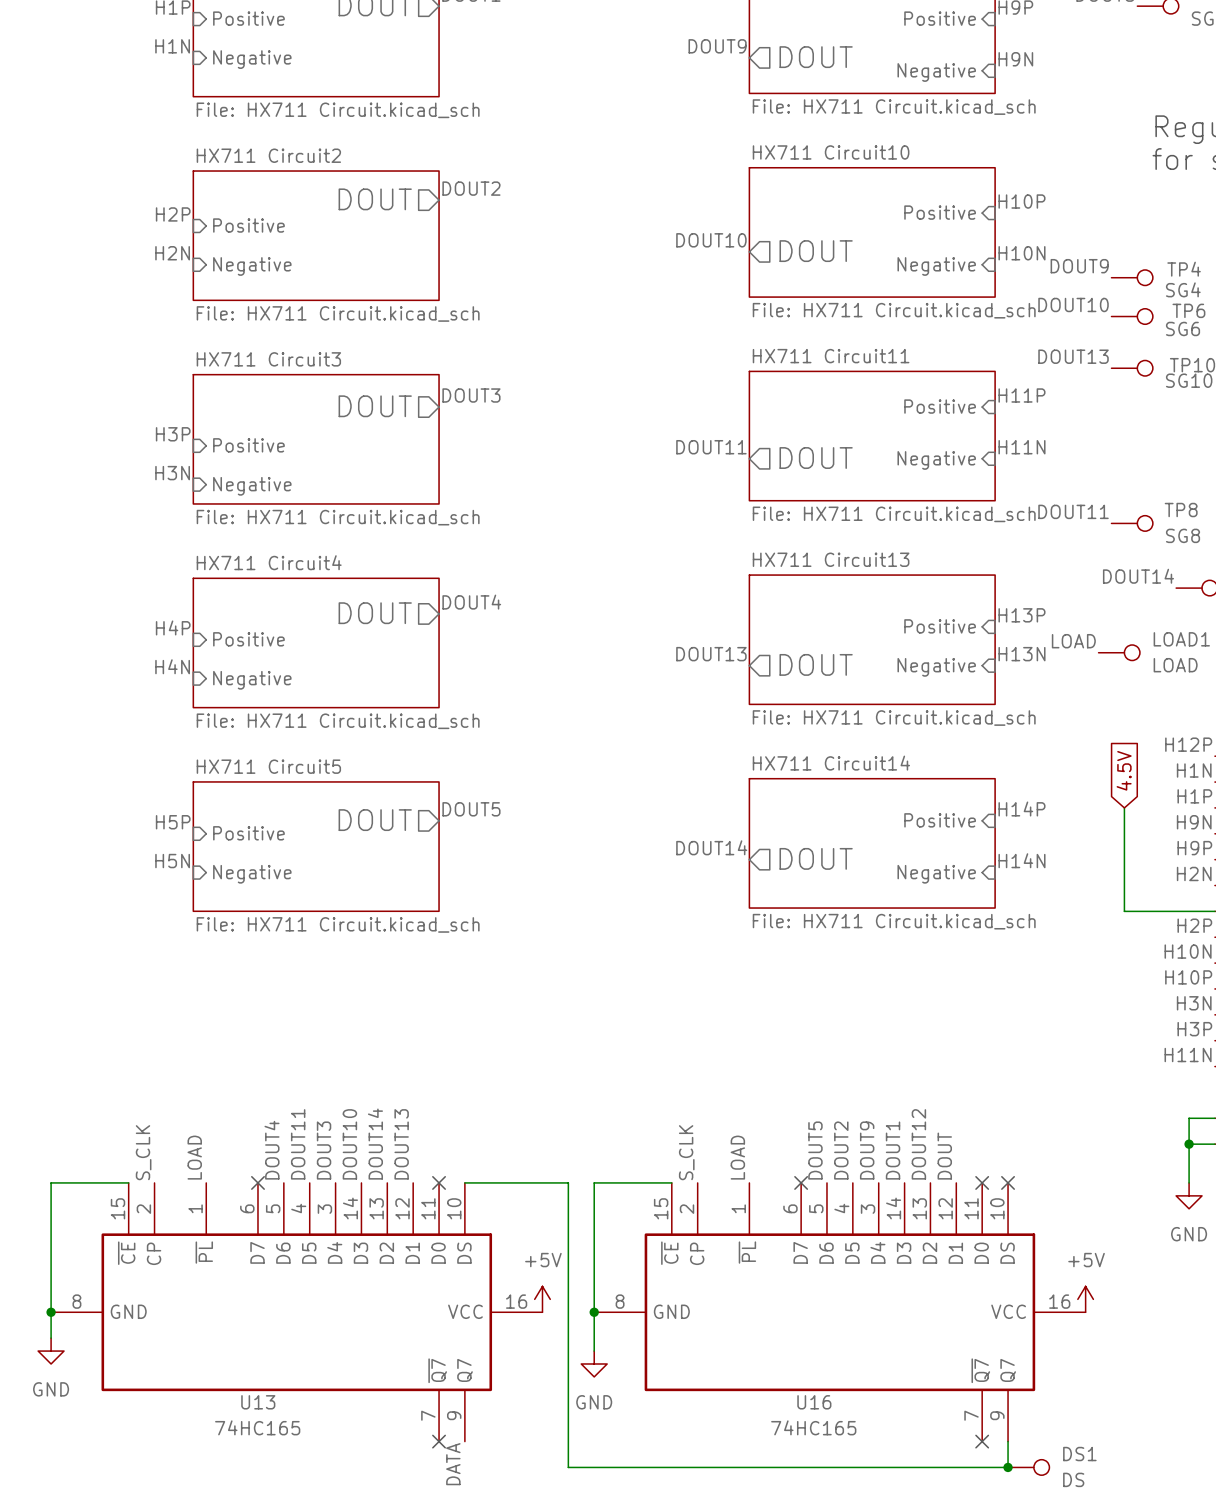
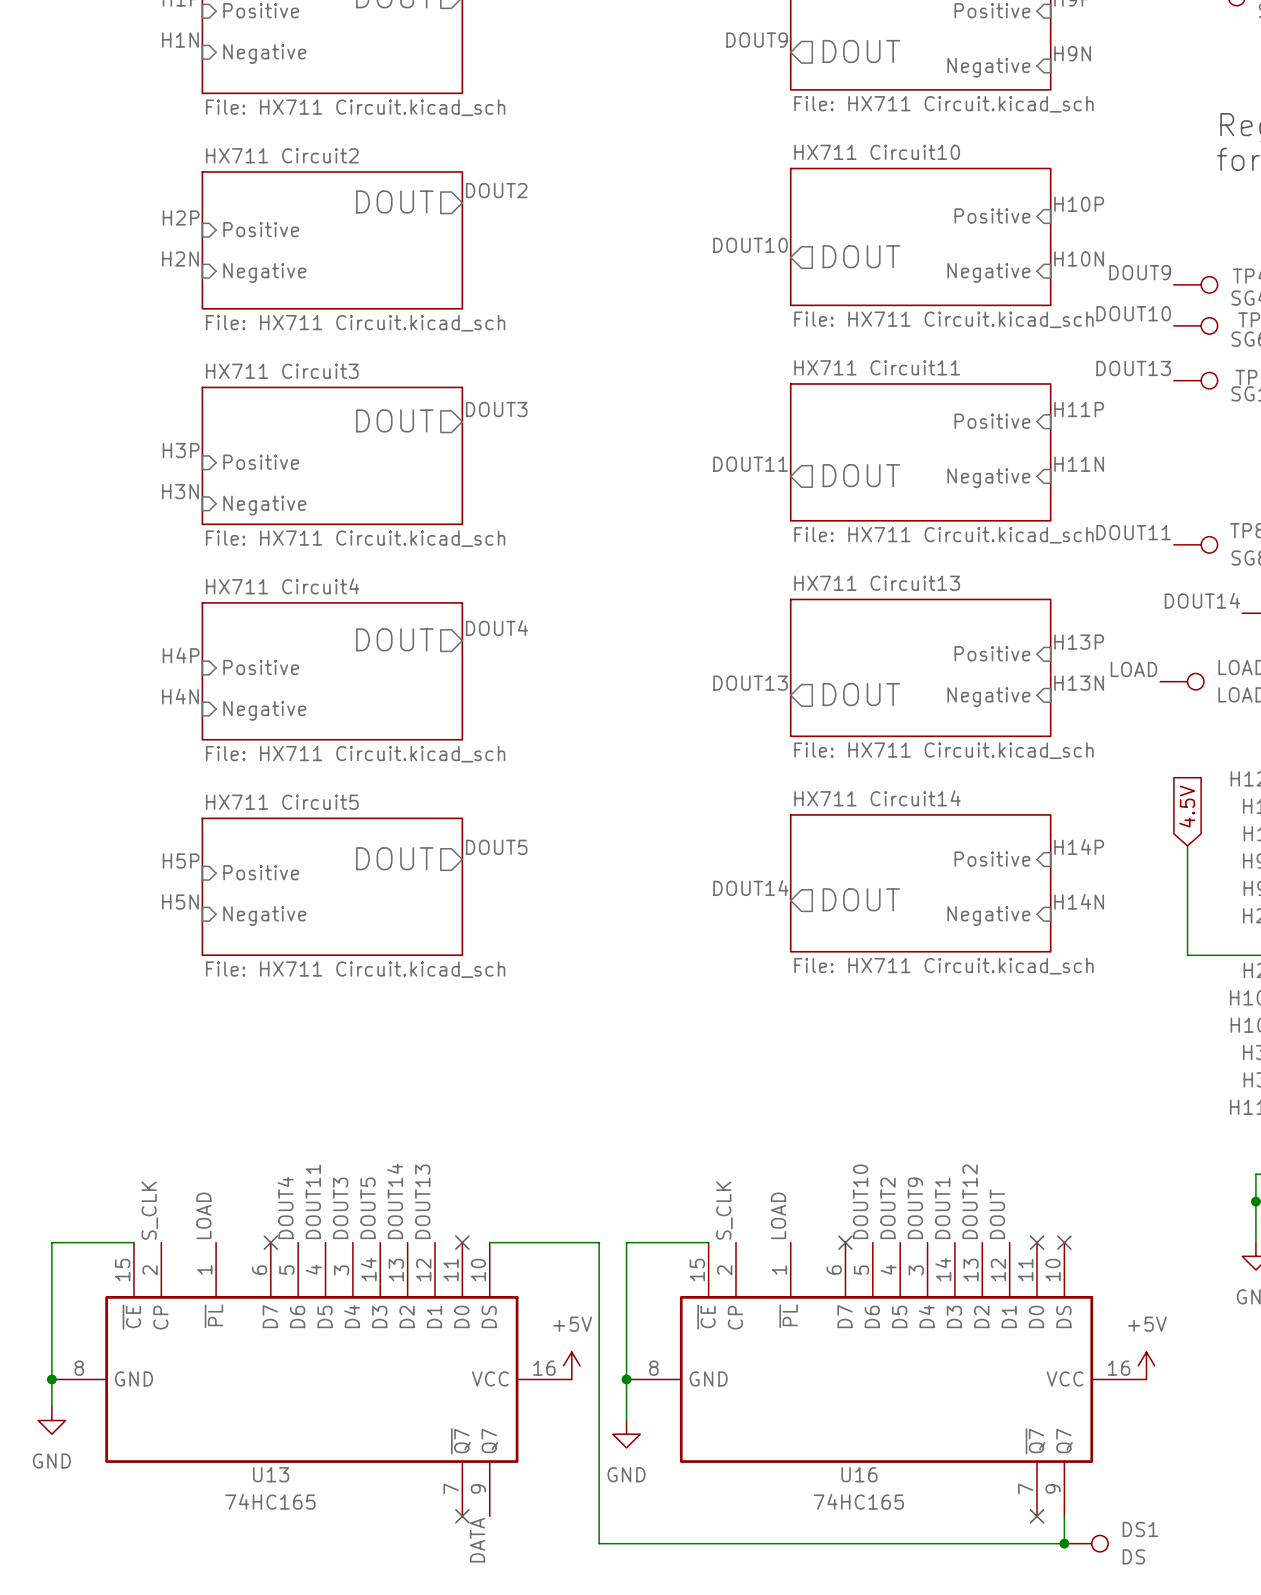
label: DOUT10 (349, 1144) -> DOUT5 (368, 1208)
label: DOUT5 (815, 1150) -> DOUT10 (860, 1201)

